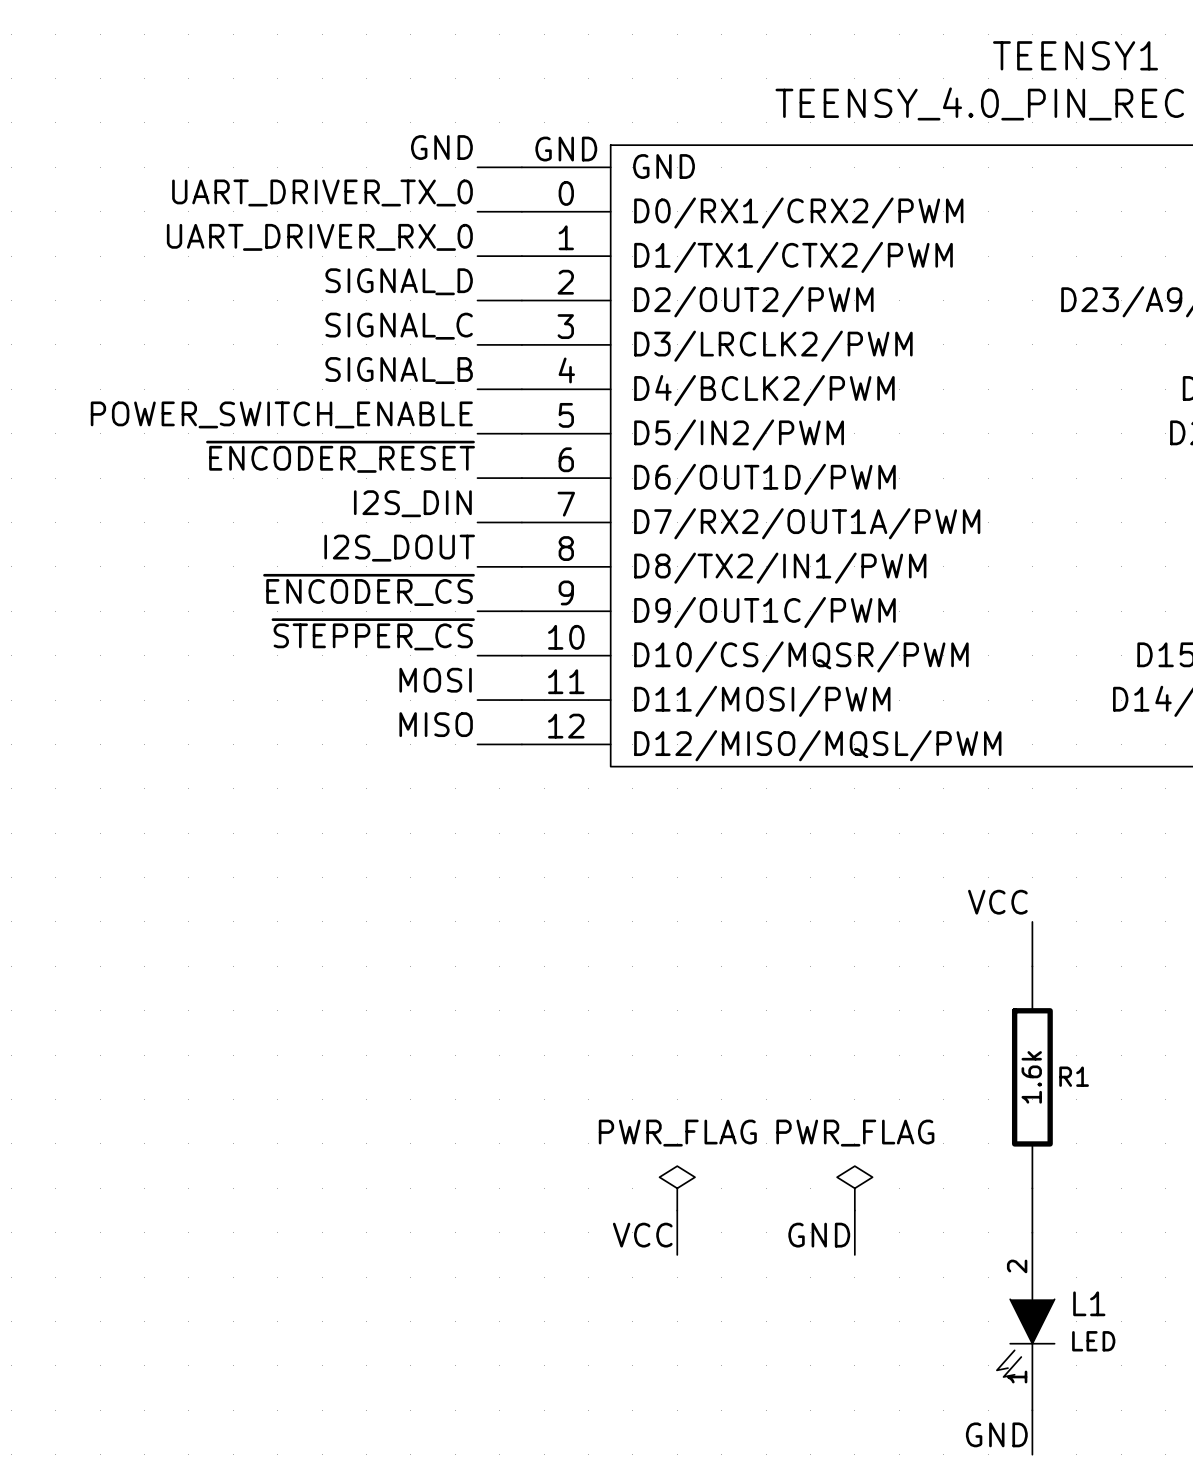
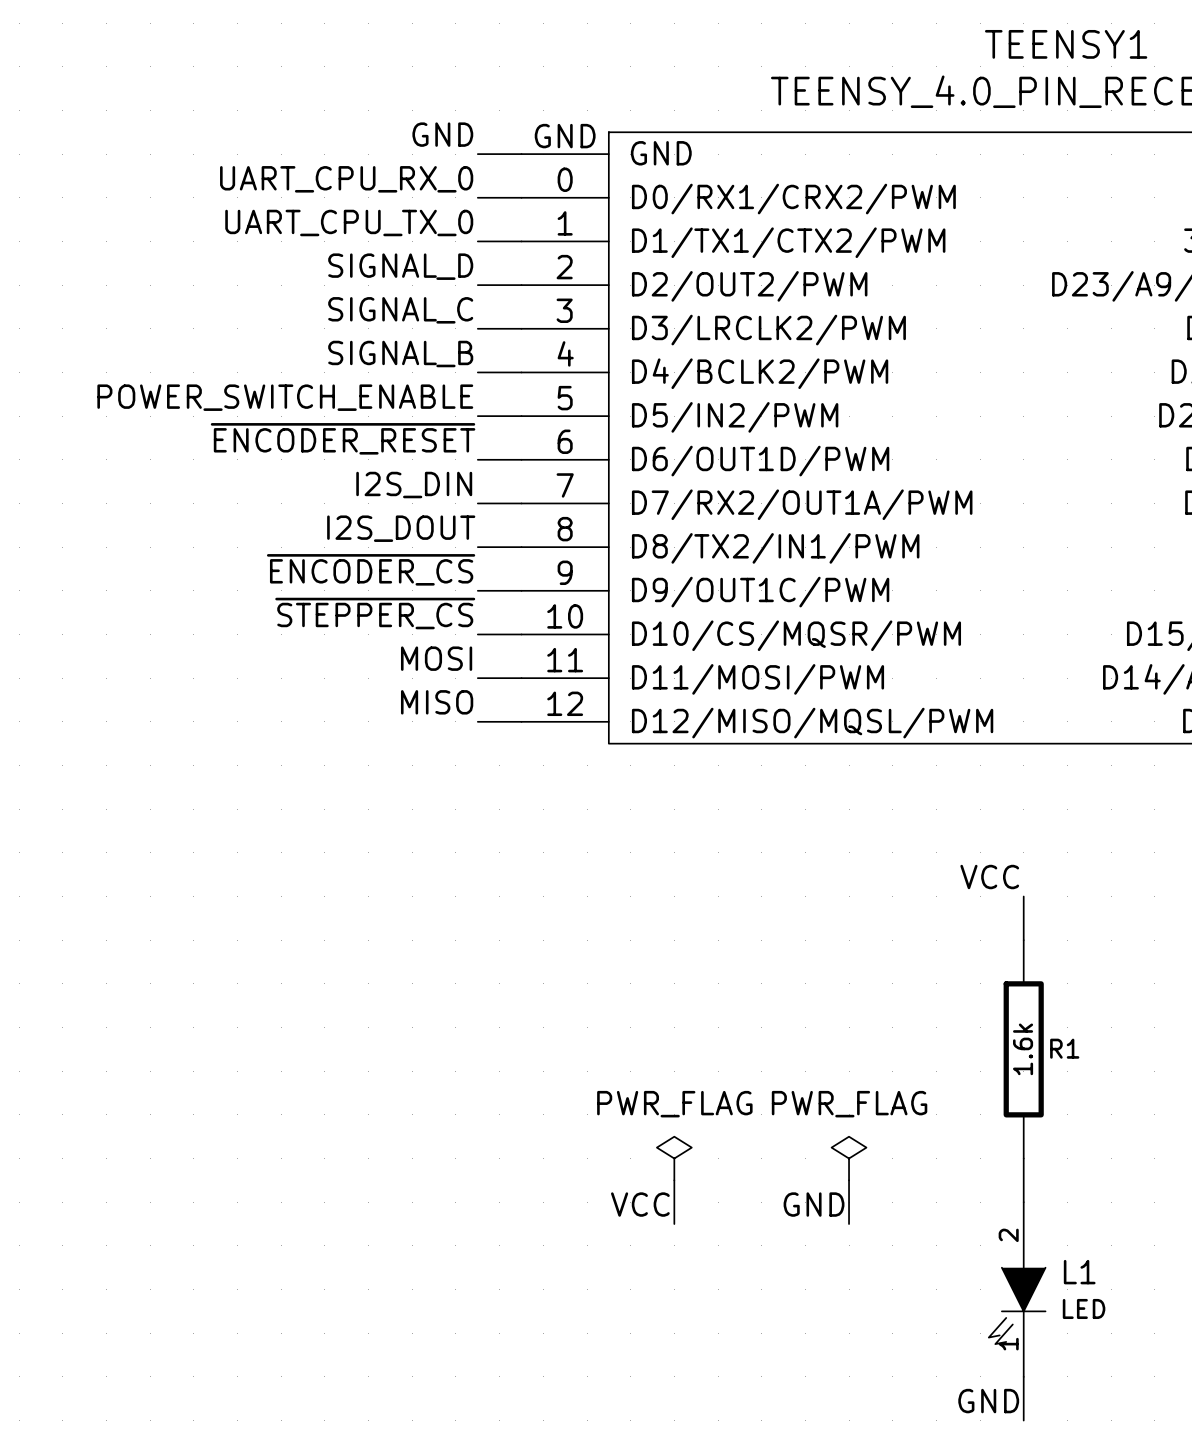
label: UART_DRIVER_TX_0 (322, 192) -> UART_CPU_RX_0 (346, 179)
label: UART_DRIVER_RX_0 (319, 237) -> UART_CPU_TX_0 (349, 222)

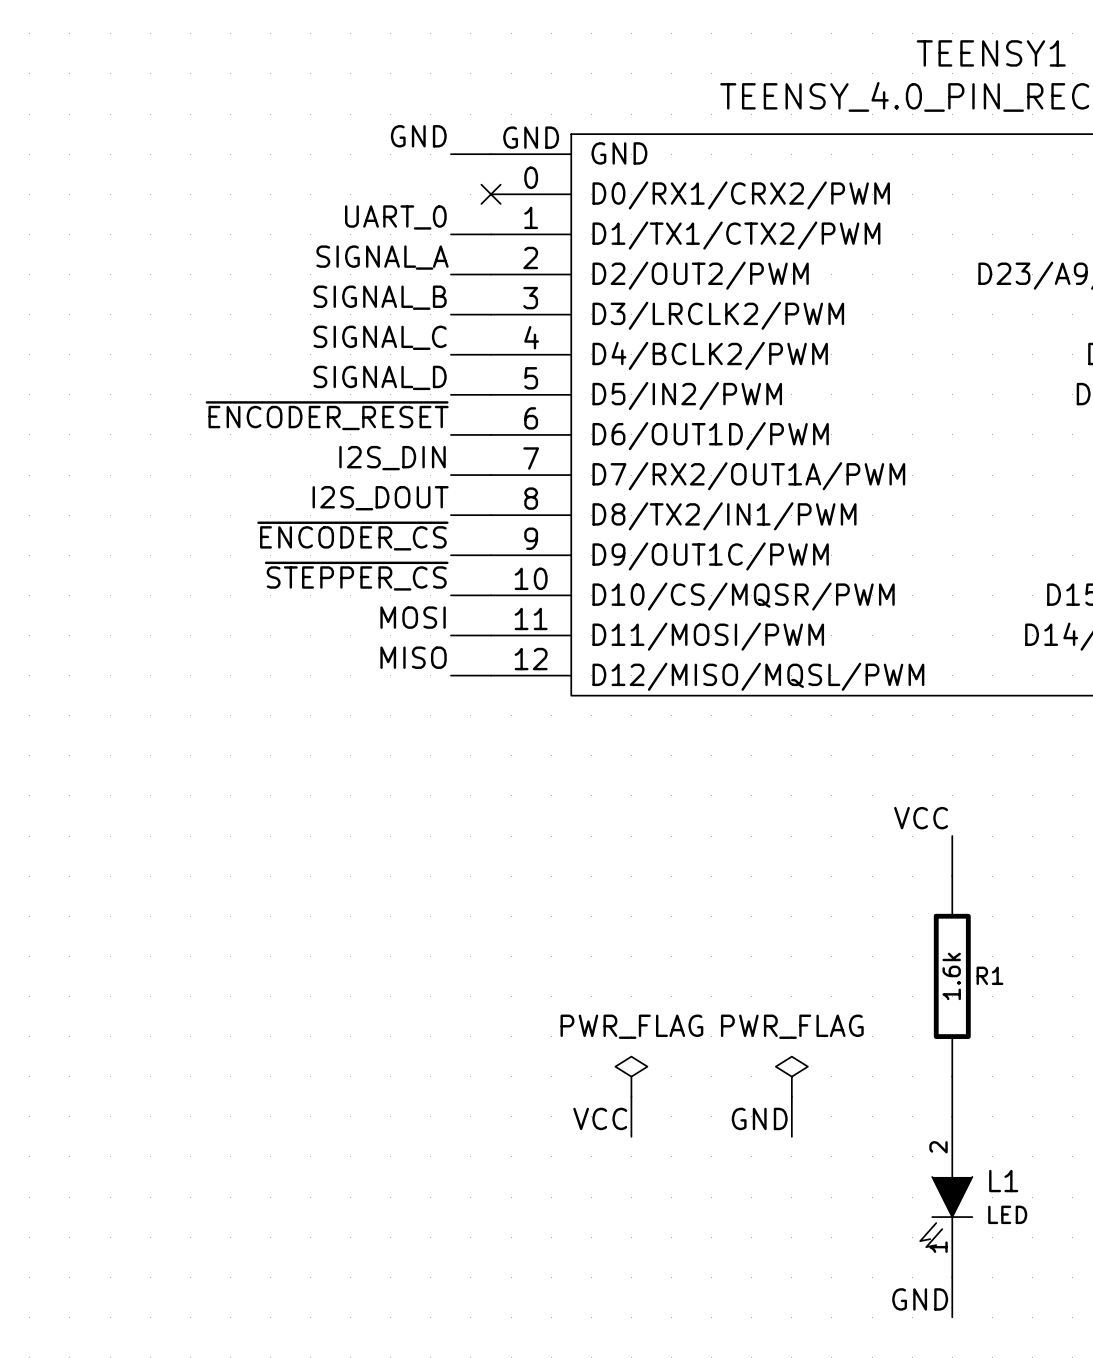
label: UART_CPU_RX_0 (346, 179) -> none
wire: (477, 197) (521, 197) -> none
no-connect mark: none -> (491, 194)
label: UART_CPU_TX_0 (349, 222) -> UART_0 (395, 217)
label: SIGNAL_D (400, 266) -> SIGNAL_A (382, 257)
label: SIGNAL_C (400, 310) -> SIGNAL_B (380, 297)
label: SIGNAL_B (400, 354) -> SIGNAL_C (380, 337)
label: POWER_SWITCH_ENABLE (285, 397) -> SIGNAL_D (380, 377)

